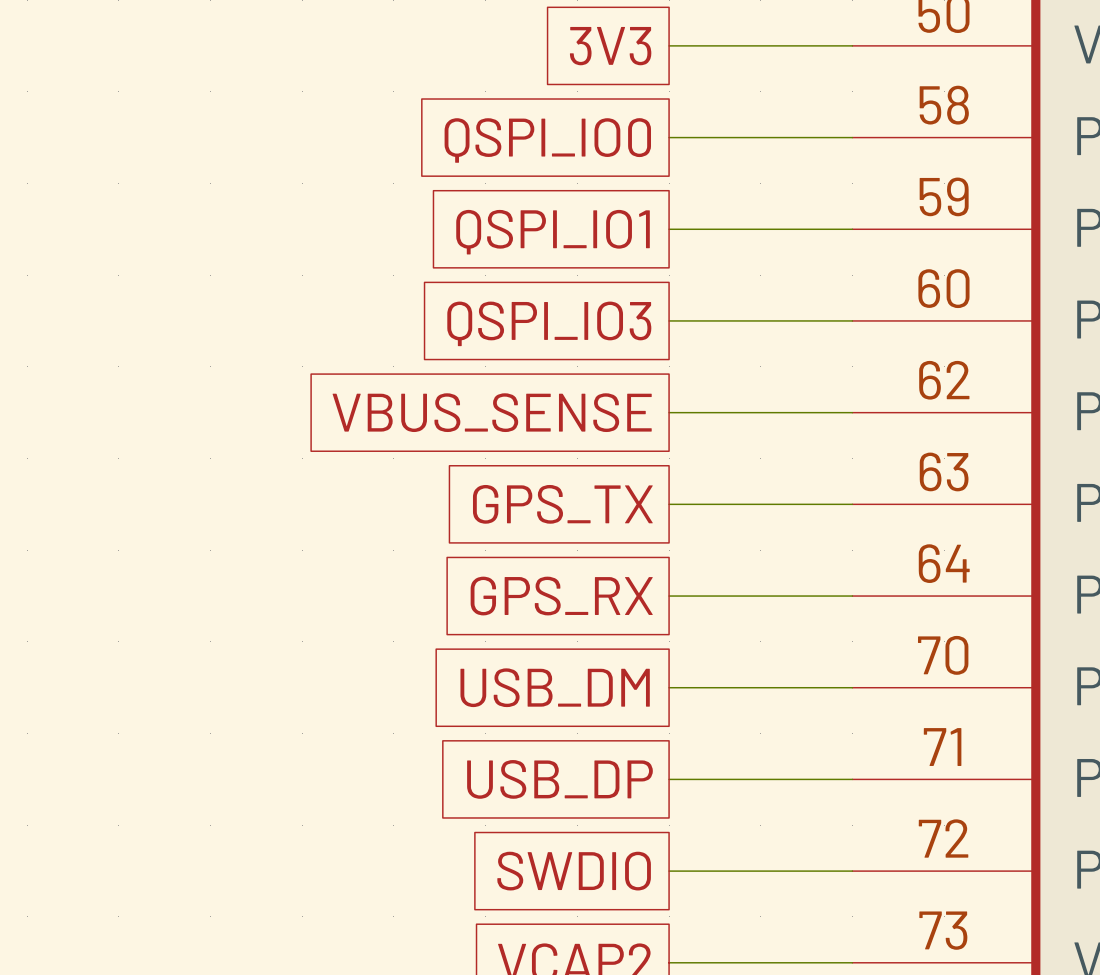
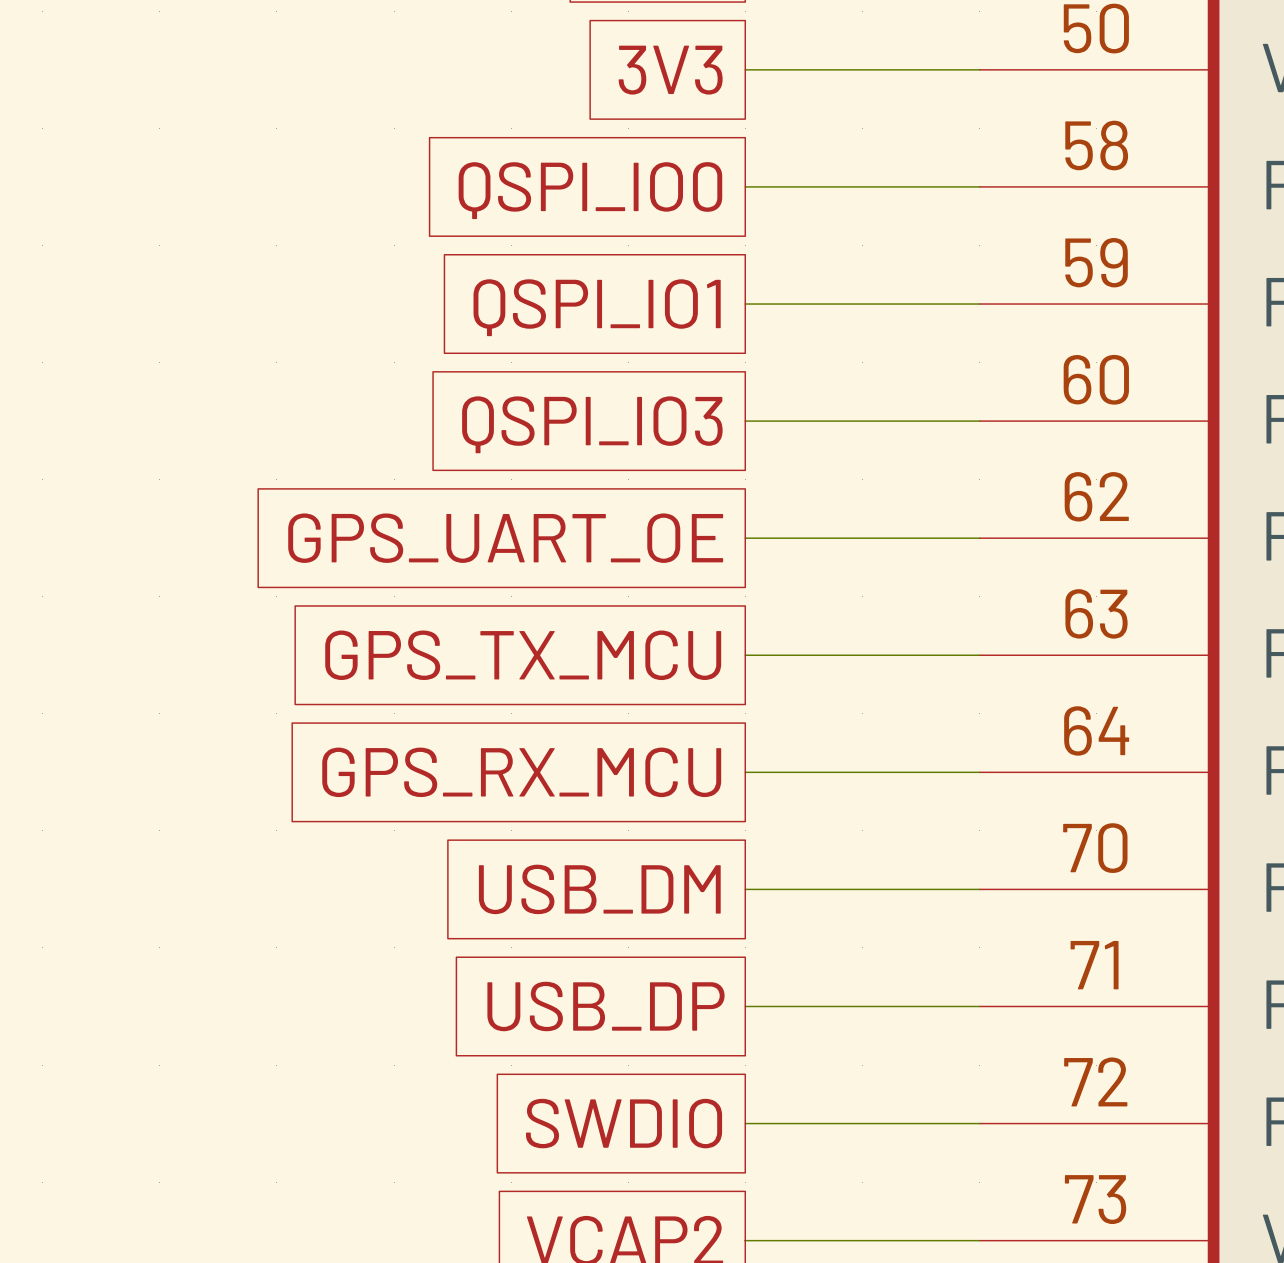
global label: VBUS_SENSE (492, 412) -> GPS_UART_OE (505, 538)
global label: GPS_TX (562, 504) -> GPS_TX_MCU (523, 655)
global label: GPS_RX (561, 596) -> GPS_RX_MCU (521, 772)

